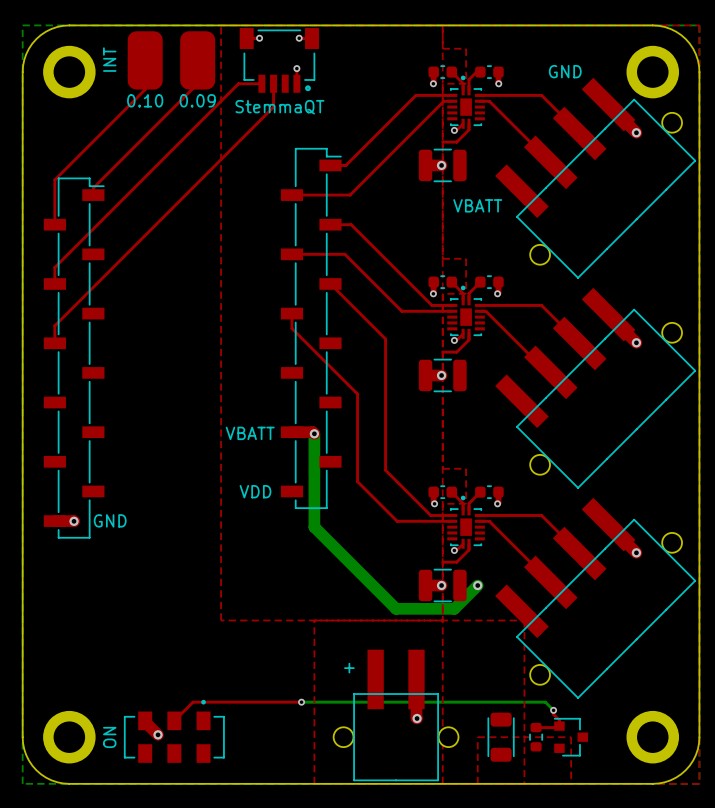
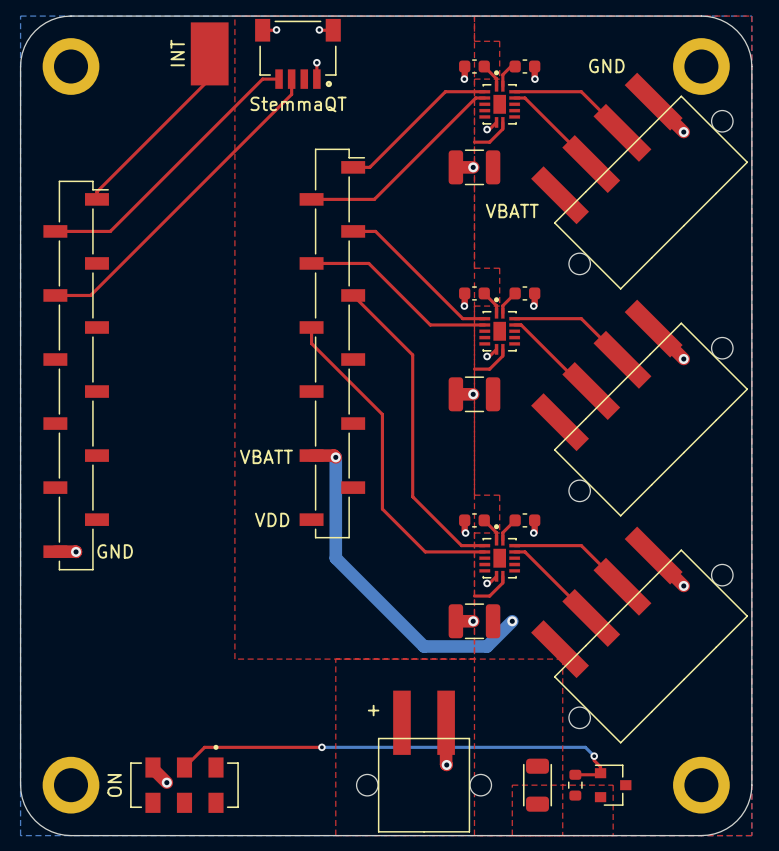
part footprint: [180, 31, 216, 90] -> [190, 22, 229, 86]
text position: INT (109, 59) -> INT (177, 52)
top track: (145, 60) (145, 89) (54, 179) (54, 224) -> (262, 79) (110, 231) (55, 231)
part: (145, 60) -> none
top track: (246, 83) (238, 83) (54, 267) (54, 283) -> (291, 94) (90, 295) (55, 295)
top track: (273, 97) (273, 107) (54, 325) (54, 343) -> none
text: 0.10 (145, 100) -> none
text: 0.09 (197, 100) -> none

